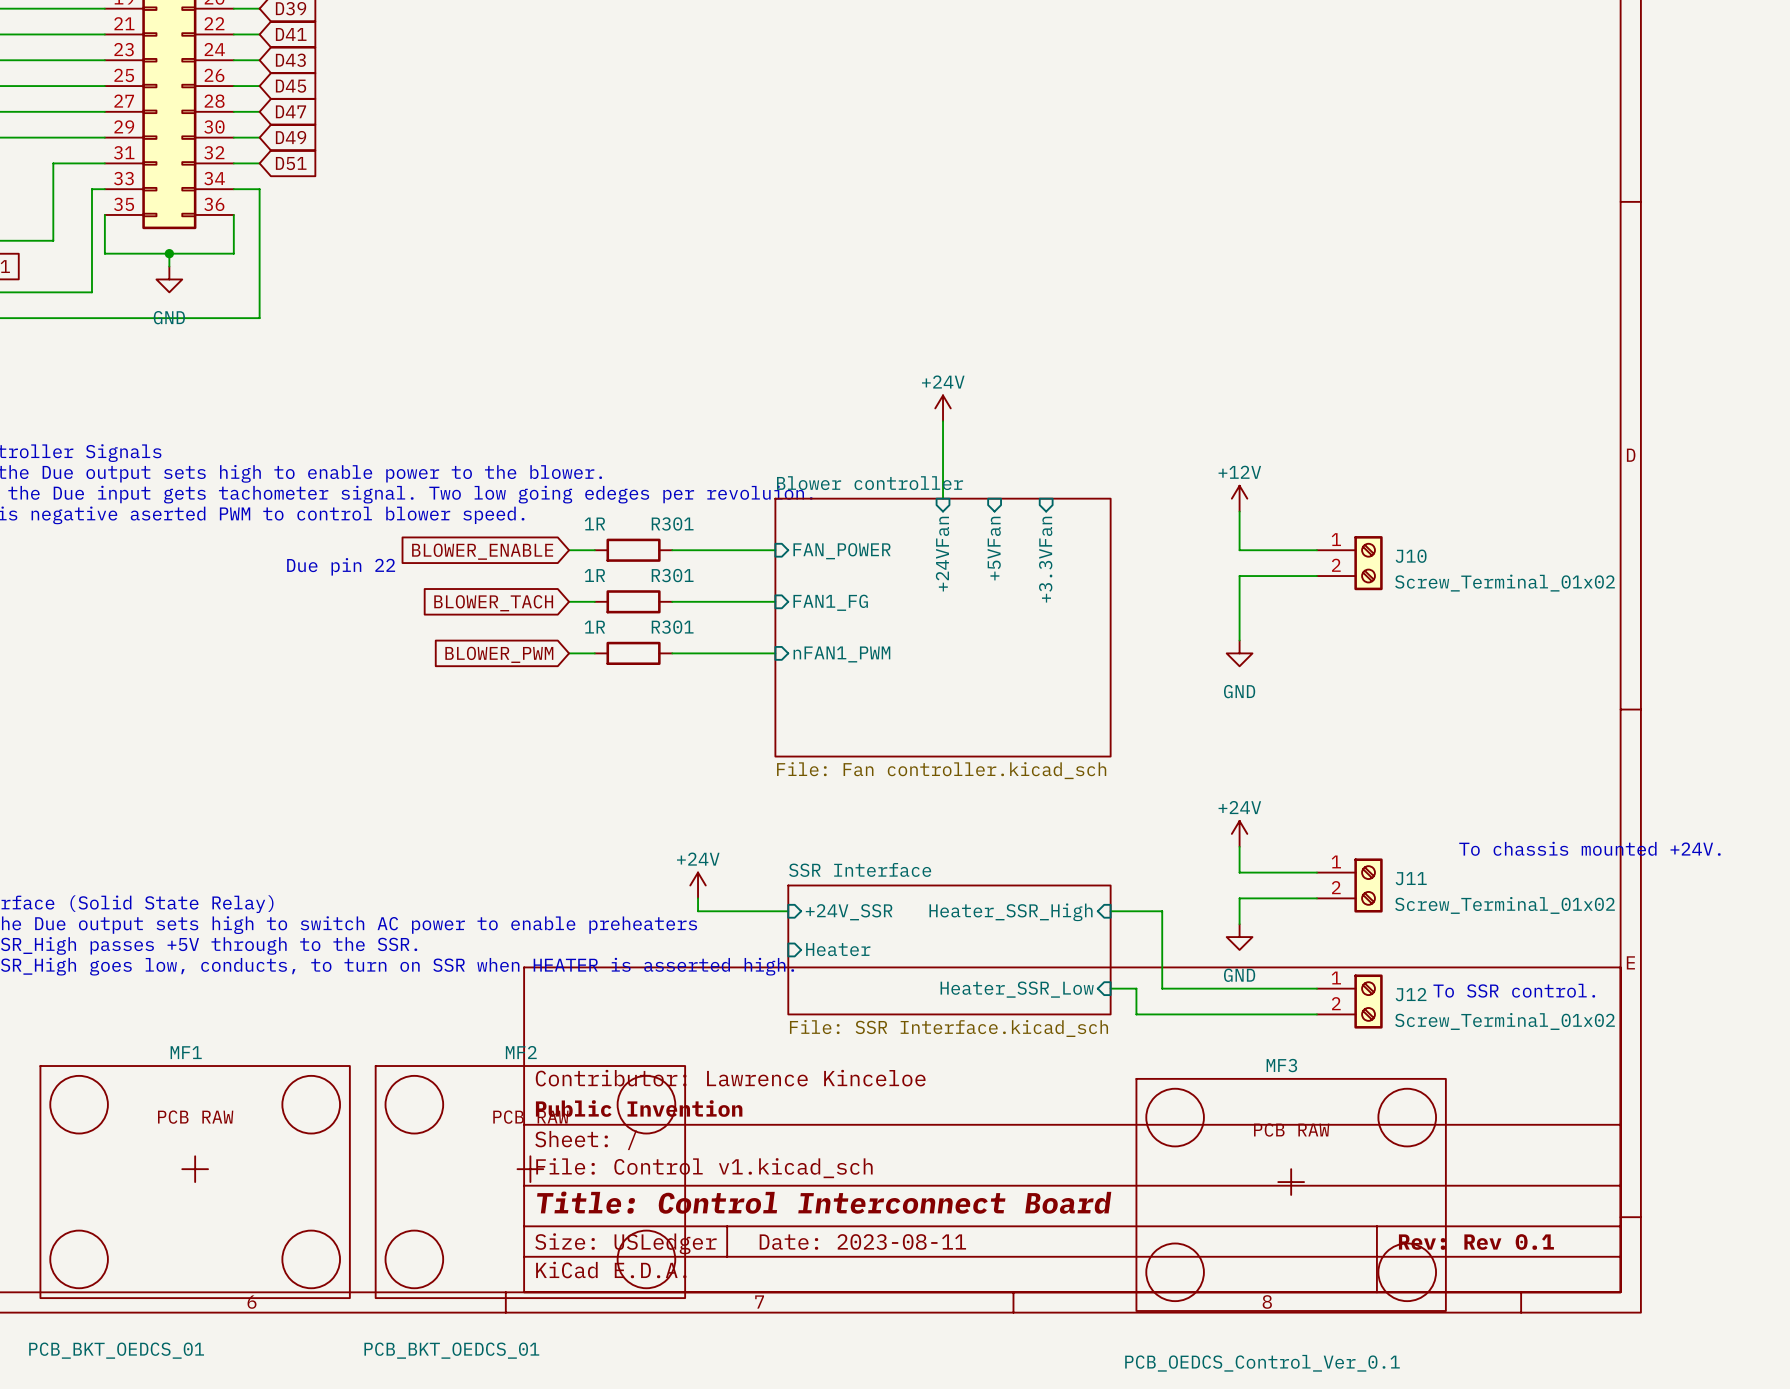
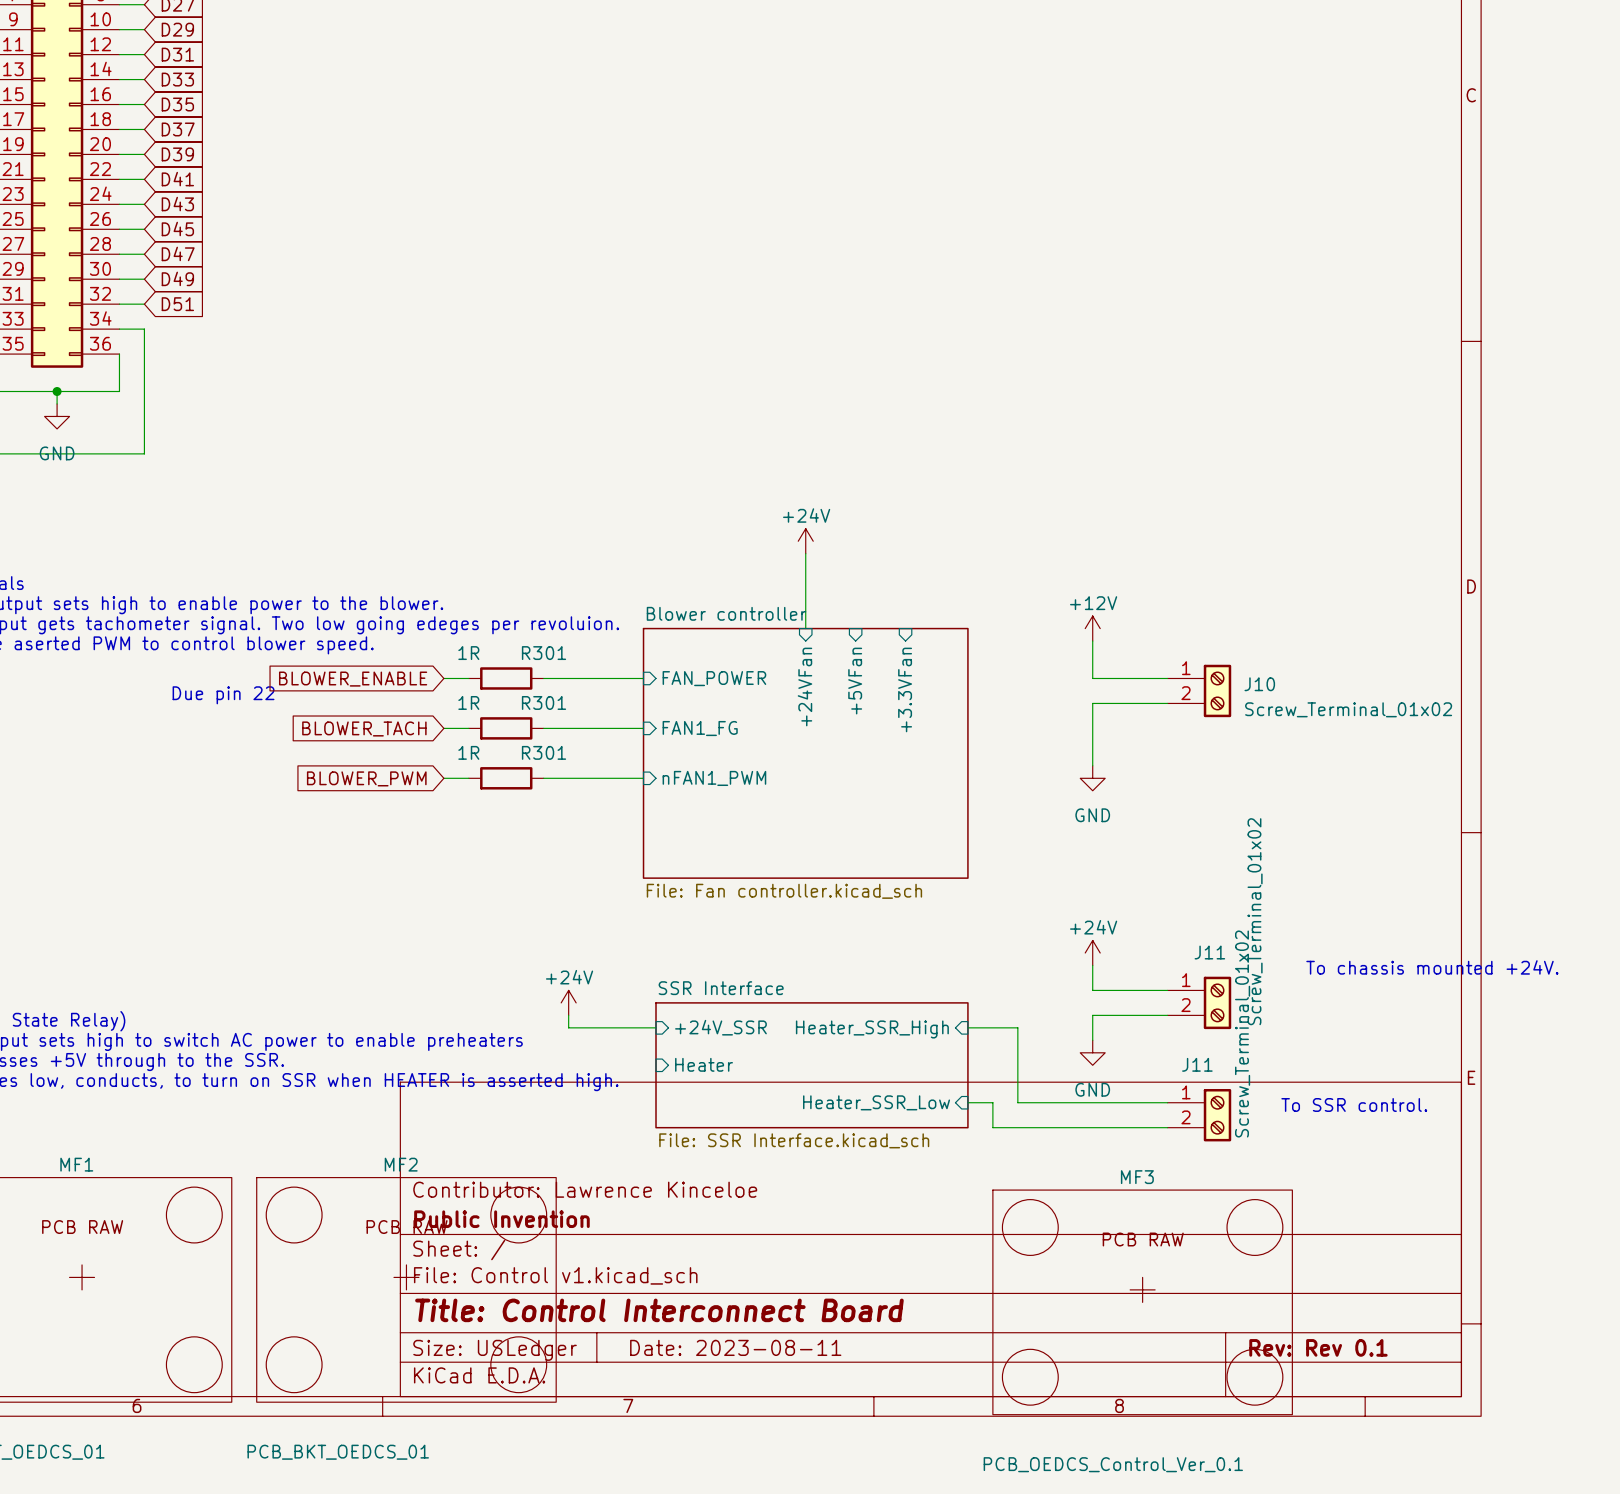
J11 name position: J11 (1411, 878) -> J11 (1209, 952)
J11 value rotation: 0° (1504, 905) -> 90° counterclockwise (1255, 921)
J12 name: J12 (1411, 994) -> J11 (1197, 1064)
J12 value rotation: 0° (1504, 1021) -> 90° counterclockwise (1242, 1034)

